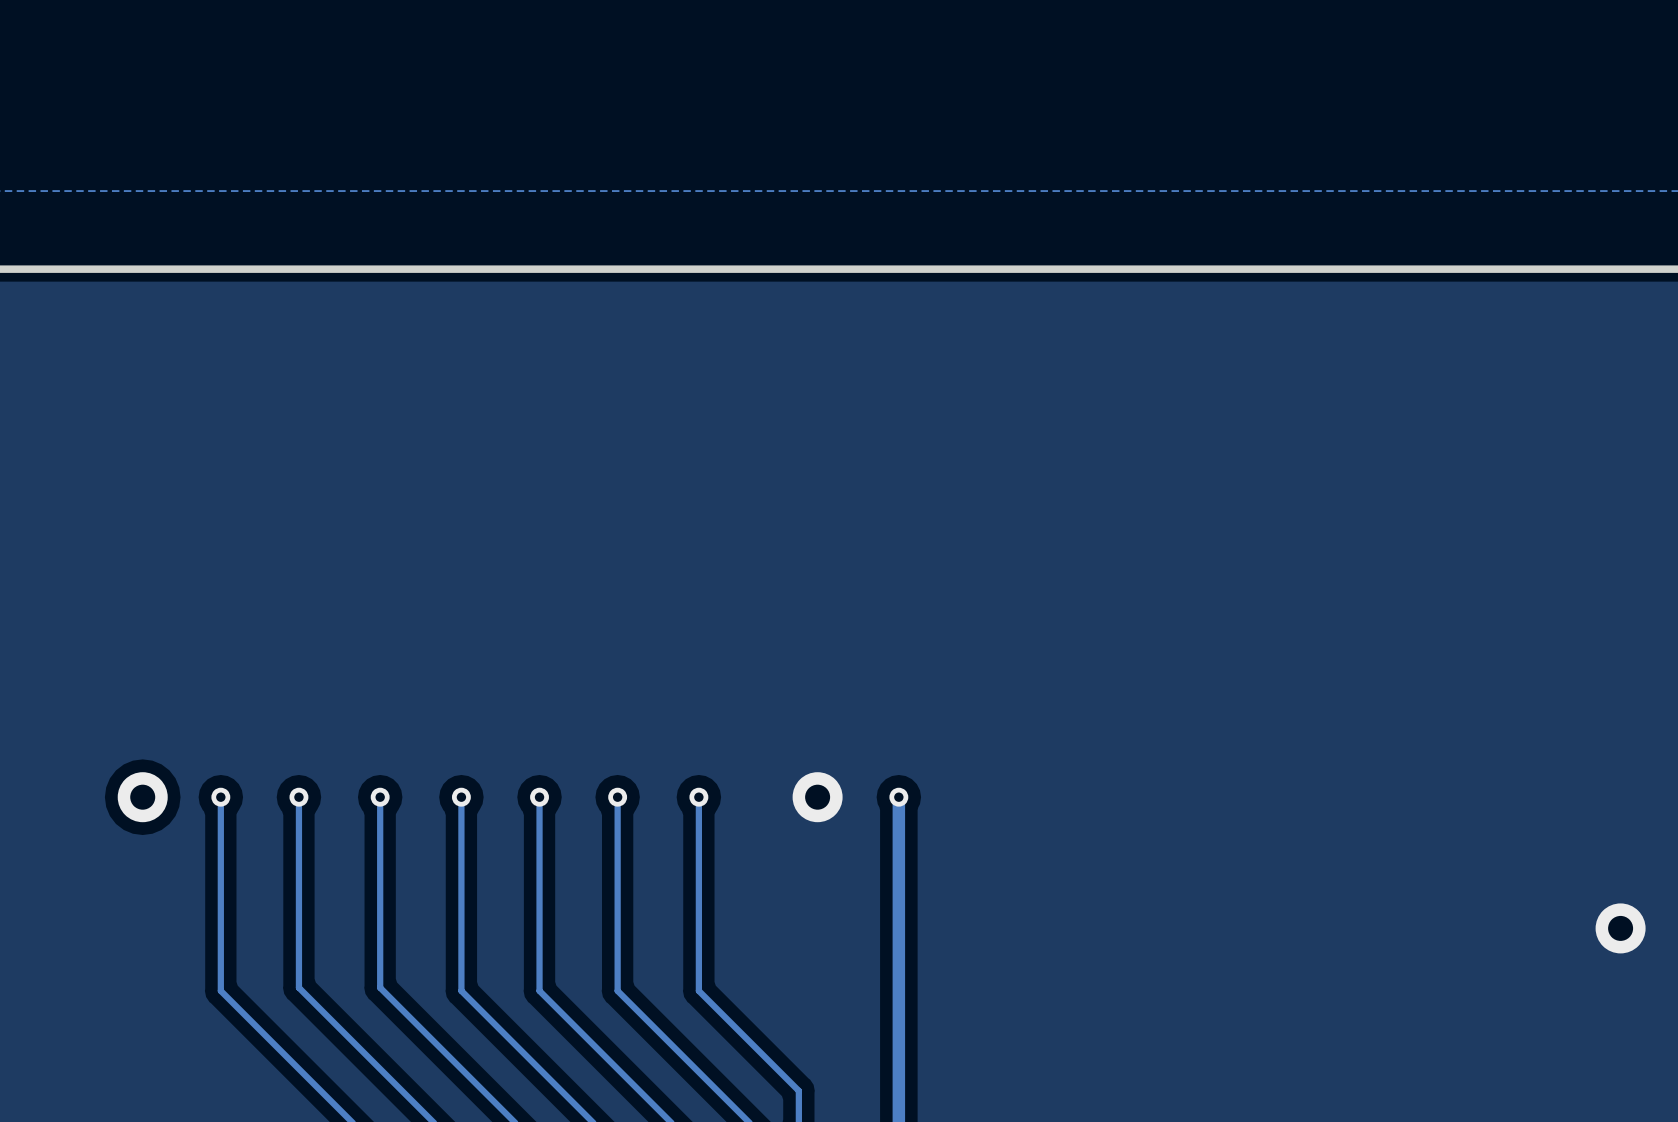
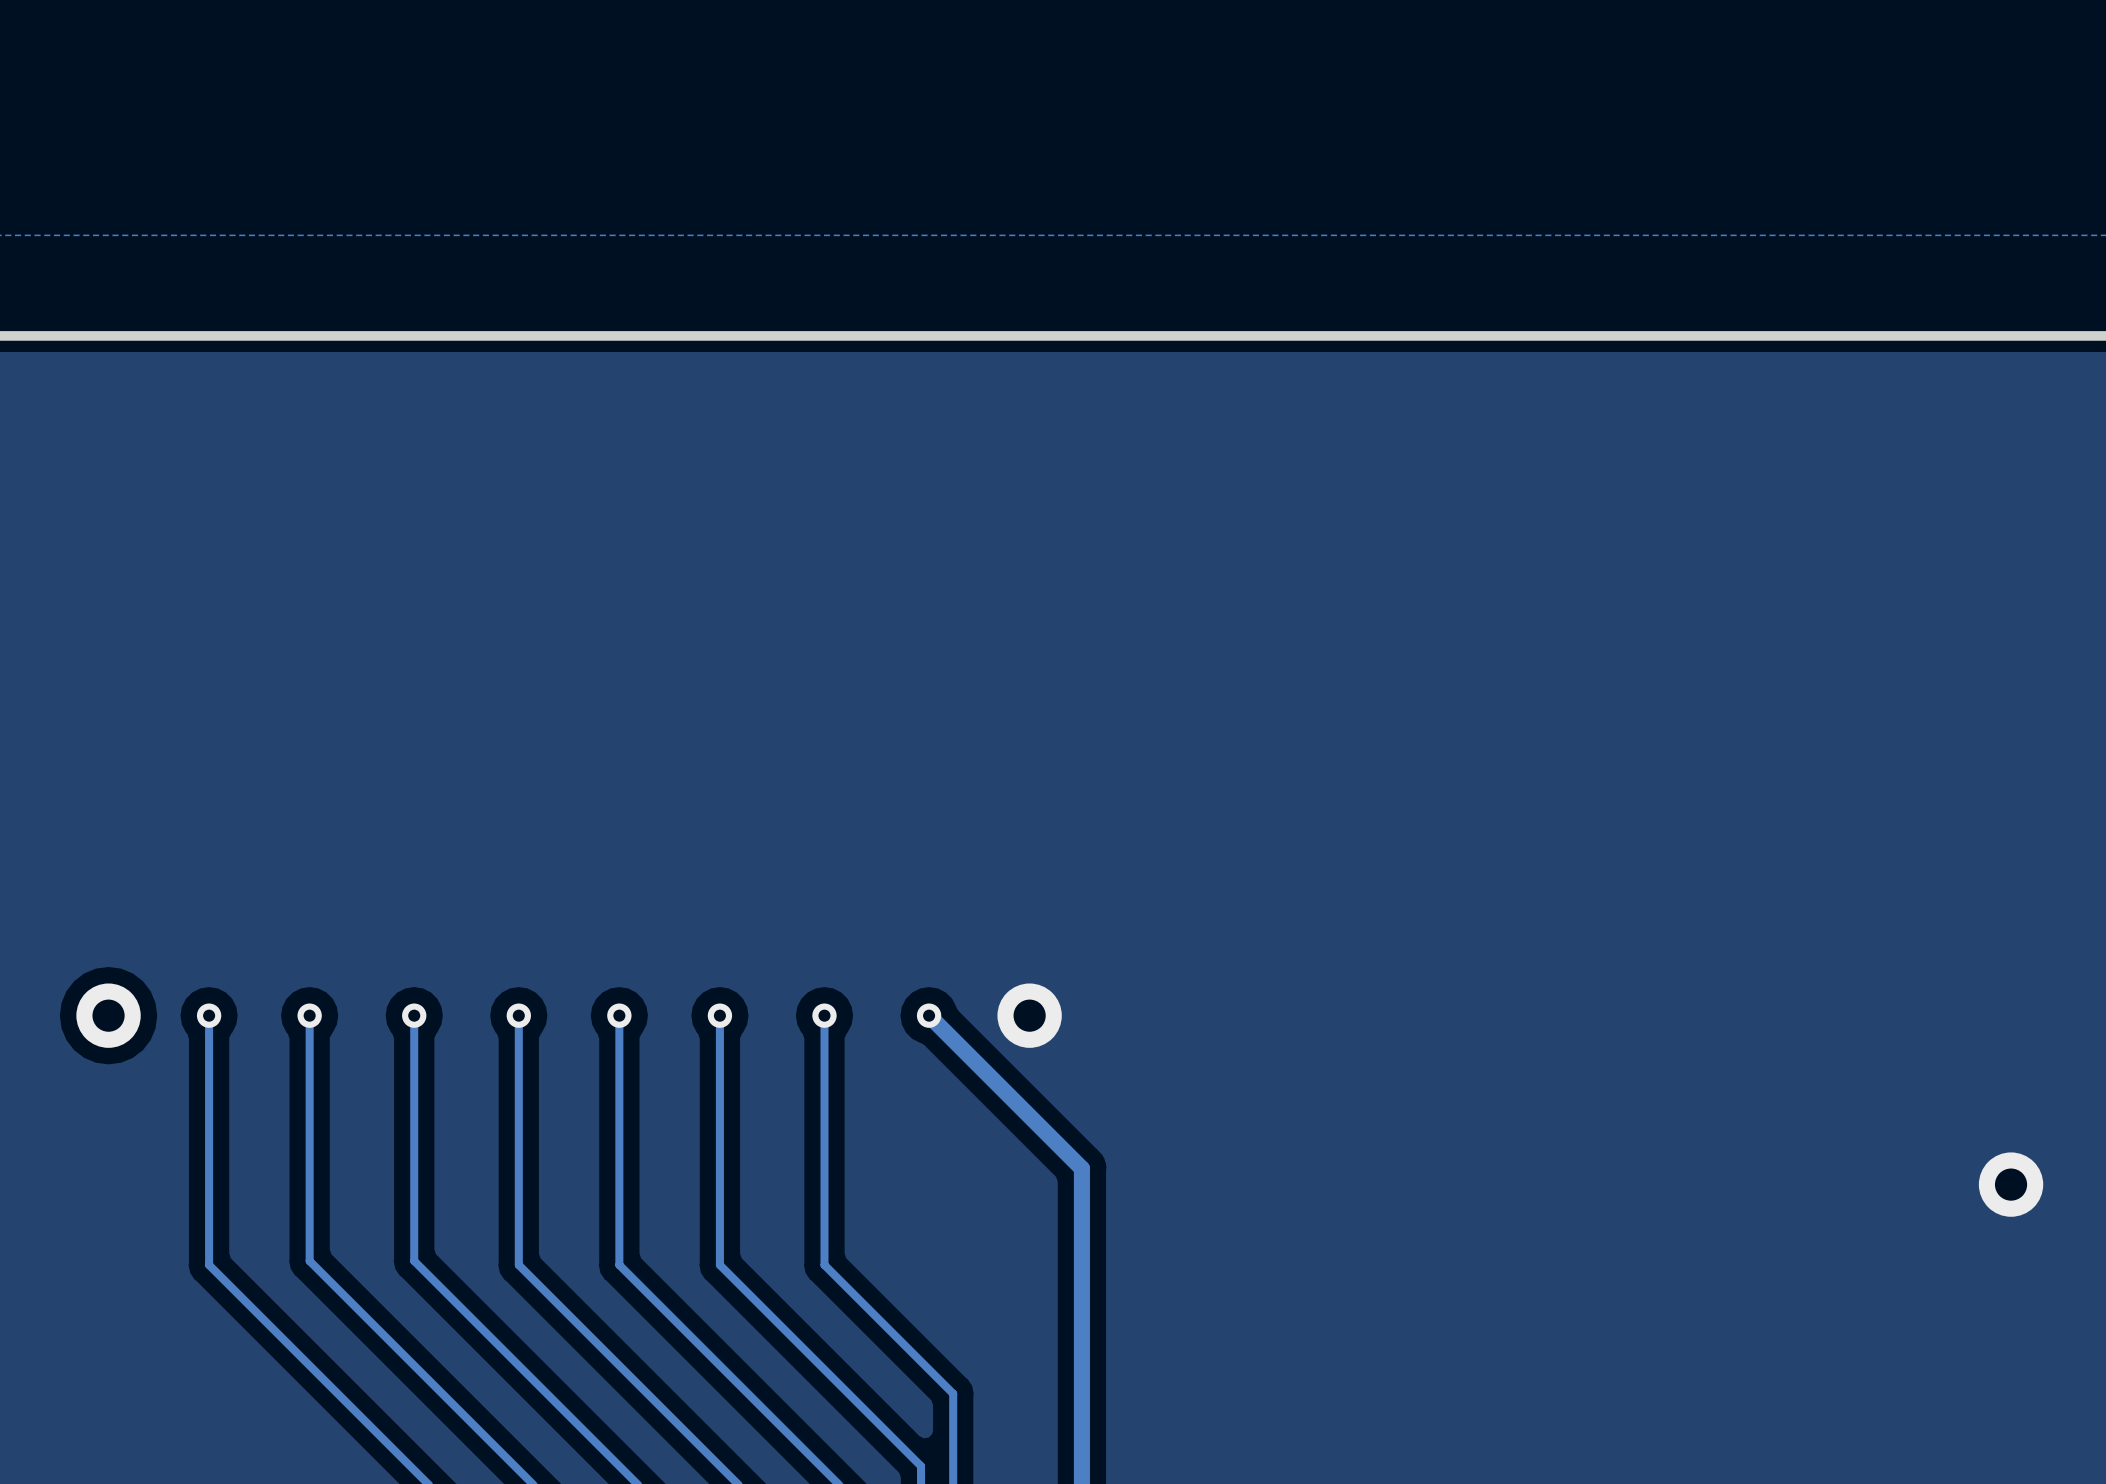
via position: (817, 797) -> (1029, 1015)
track: (898, 797) (898, 915) -> (929, 1015) (1081, 1168)
via position: (898, 797) -> (929, 1015)

